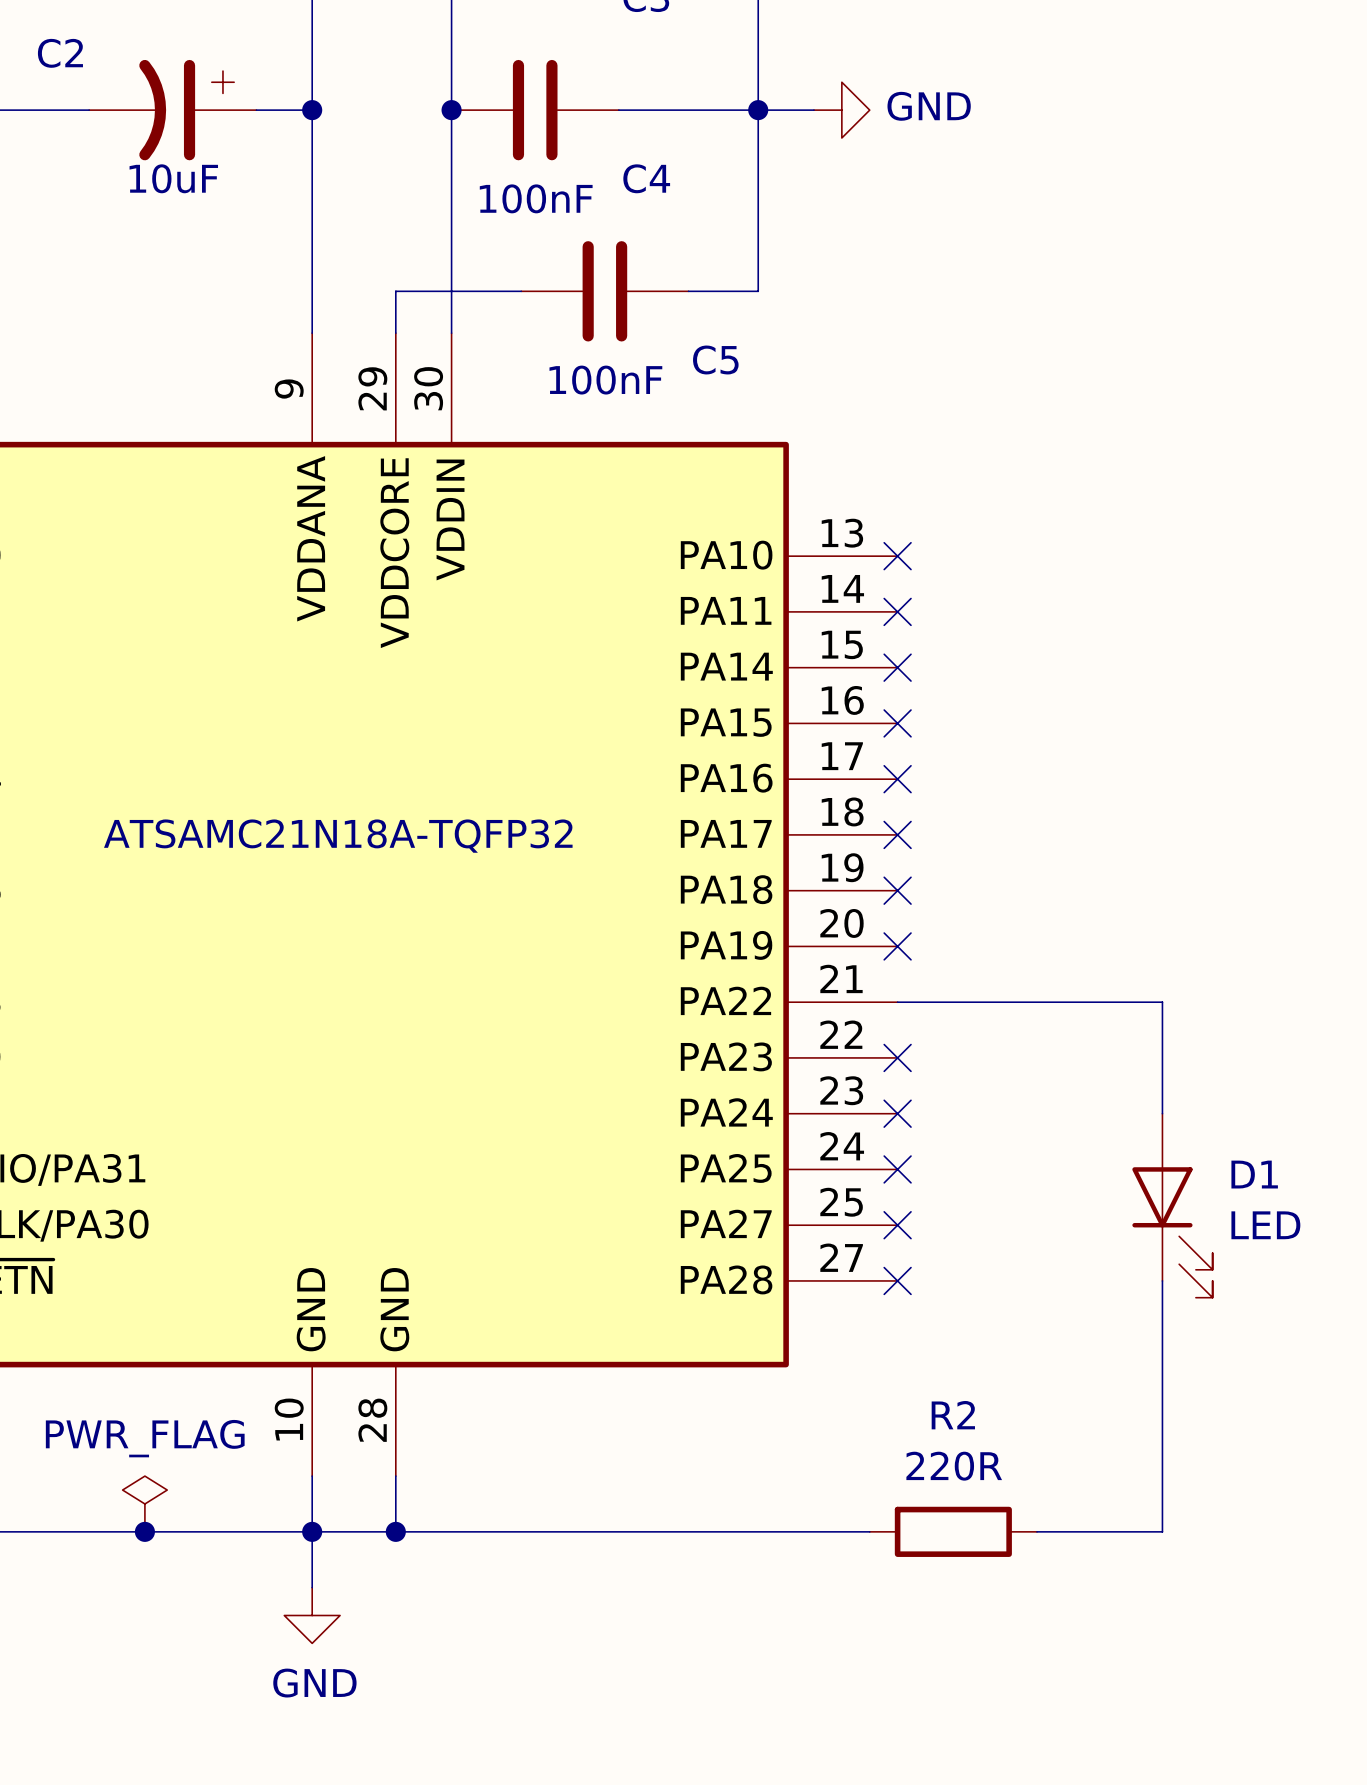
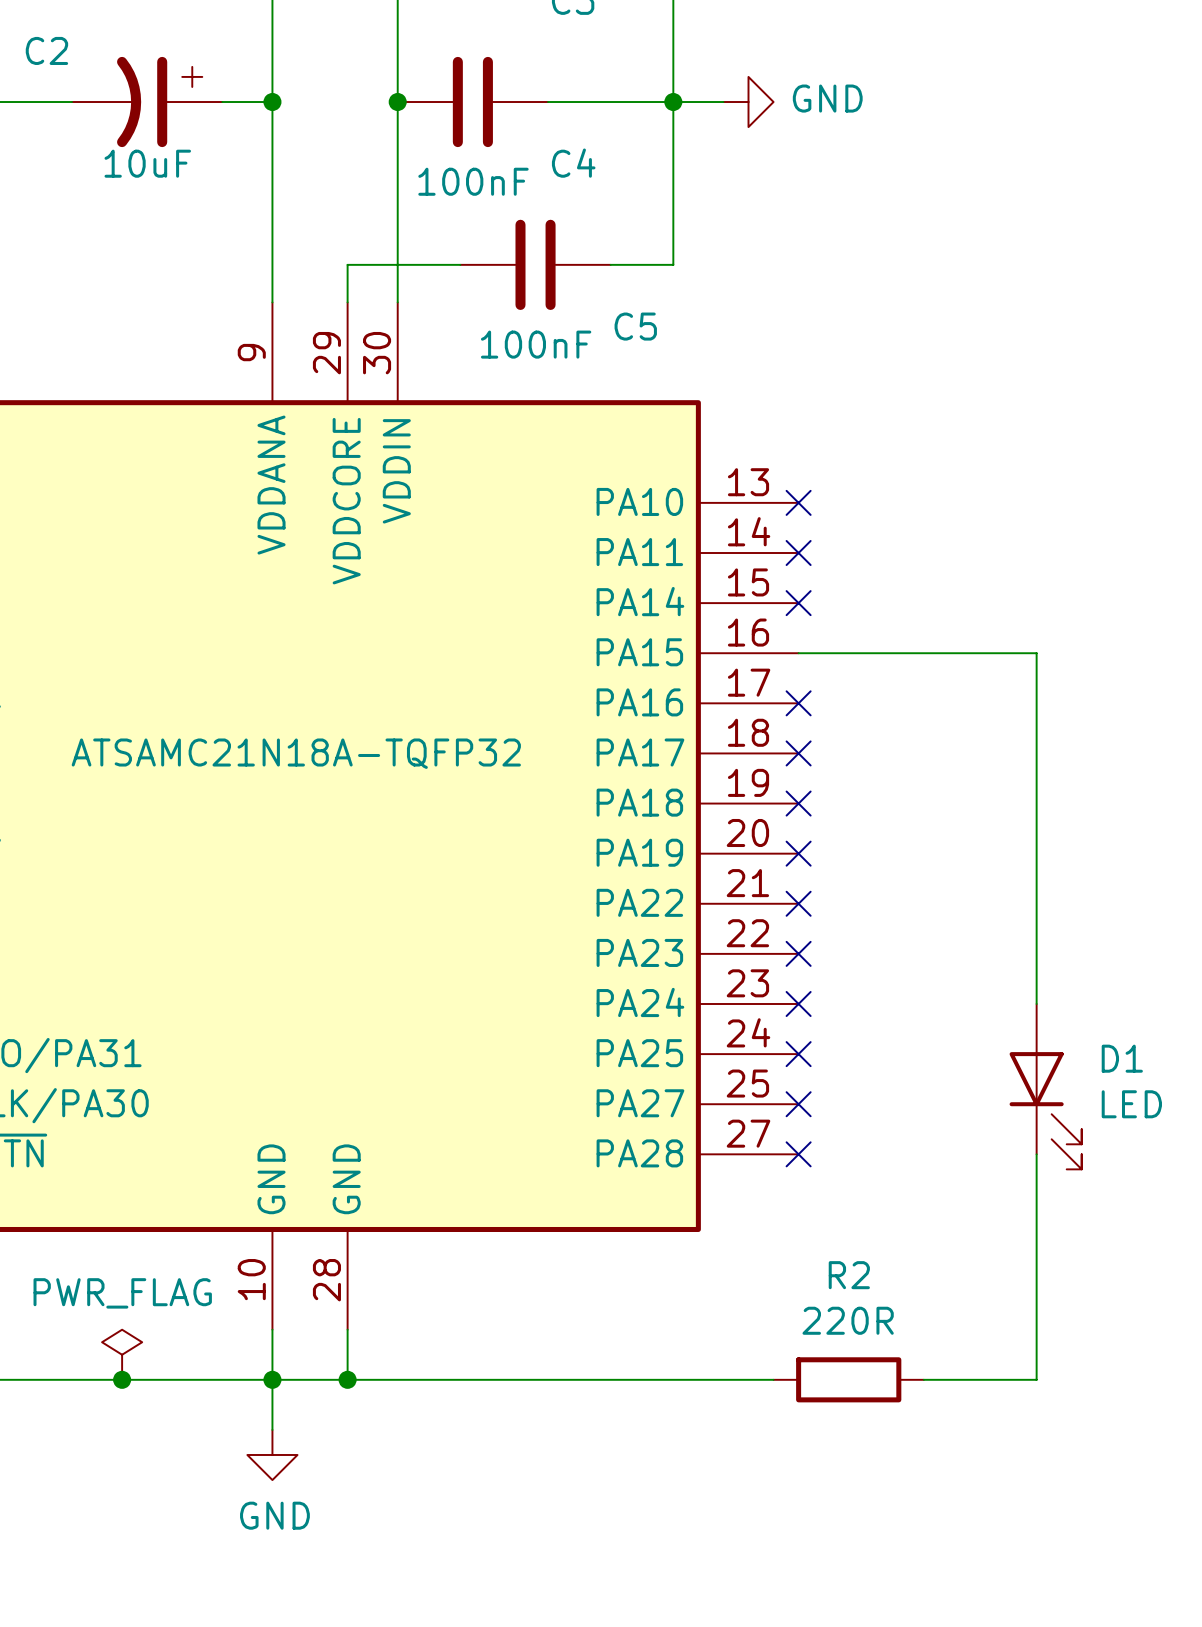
no-connect mark: (897, 723) -> none
wire: (897, 1002) (1162, 1002) -> (798, 653) (1036, 653) (1036, 903)
no-connect mark: none -> (798, 903)

